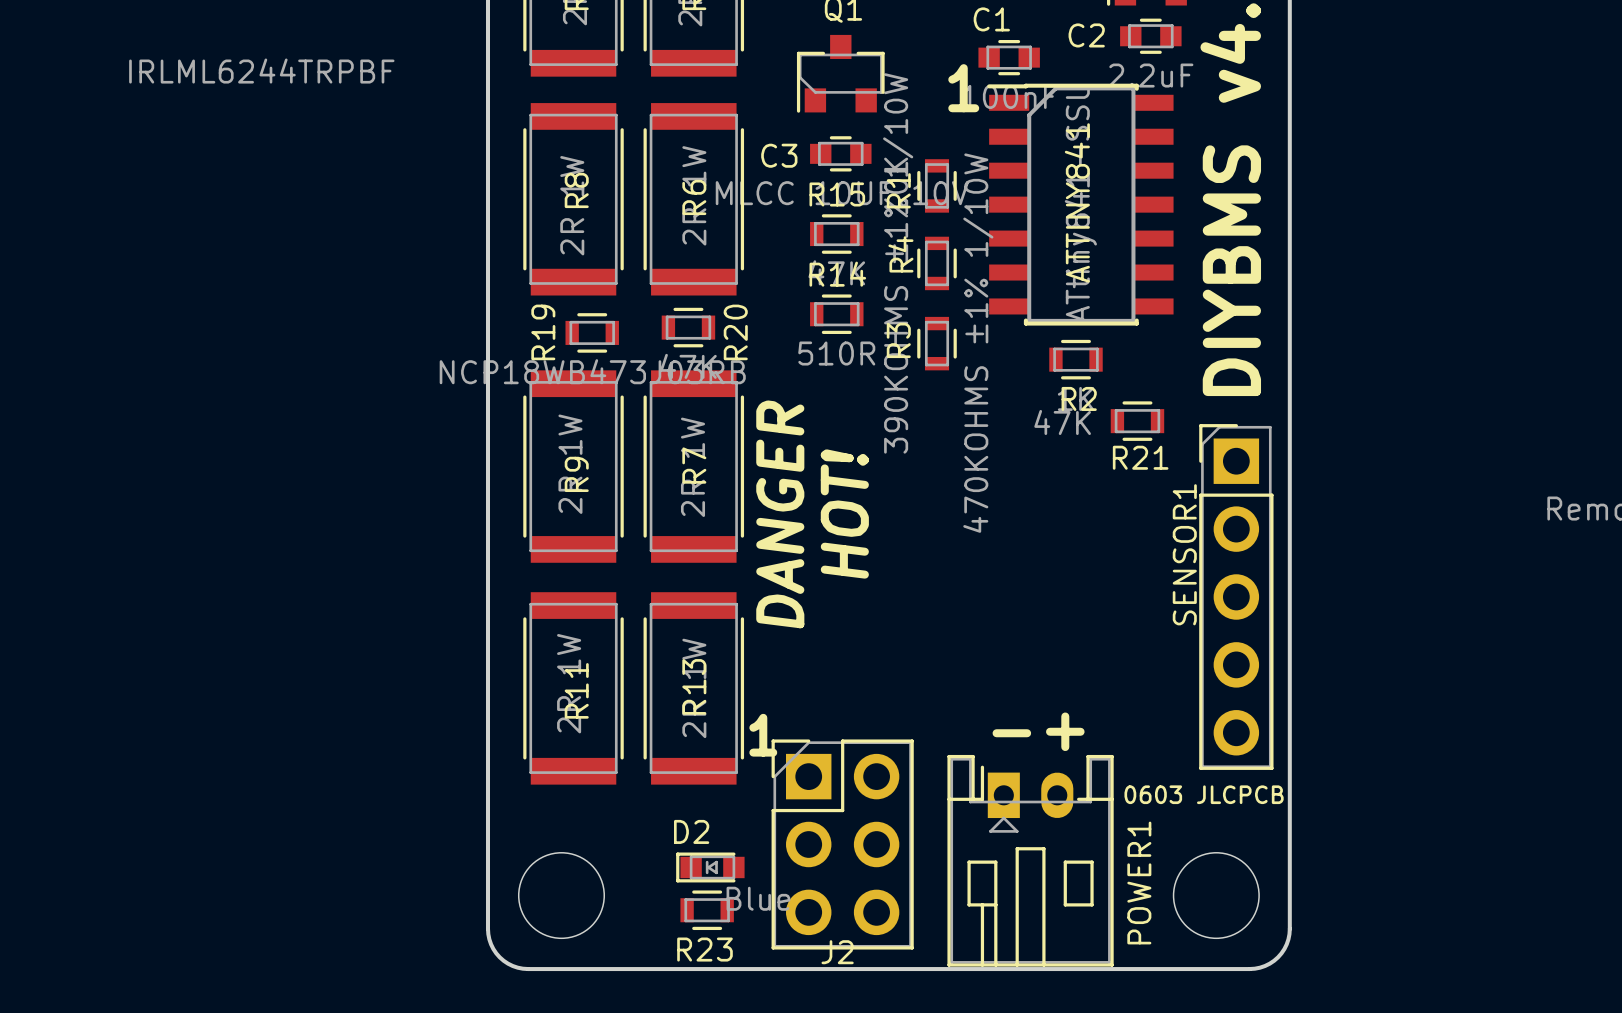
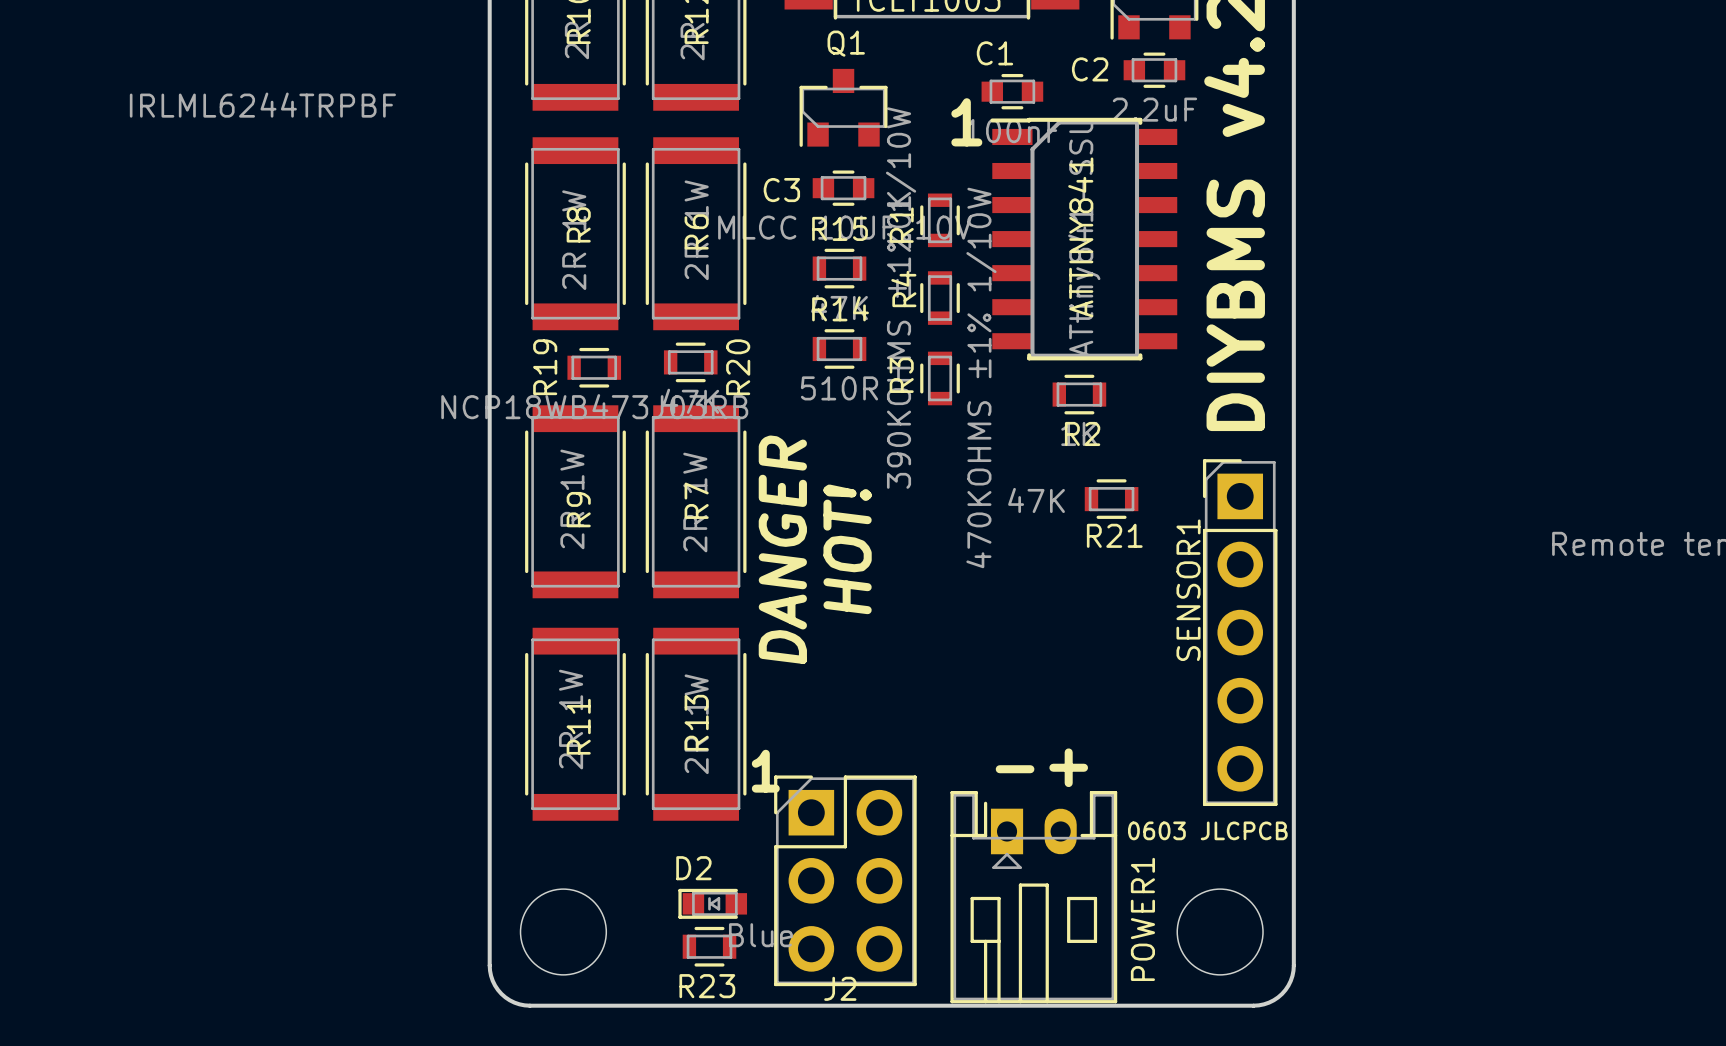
R21 position: (1137, 421) -> (1111, 499)

